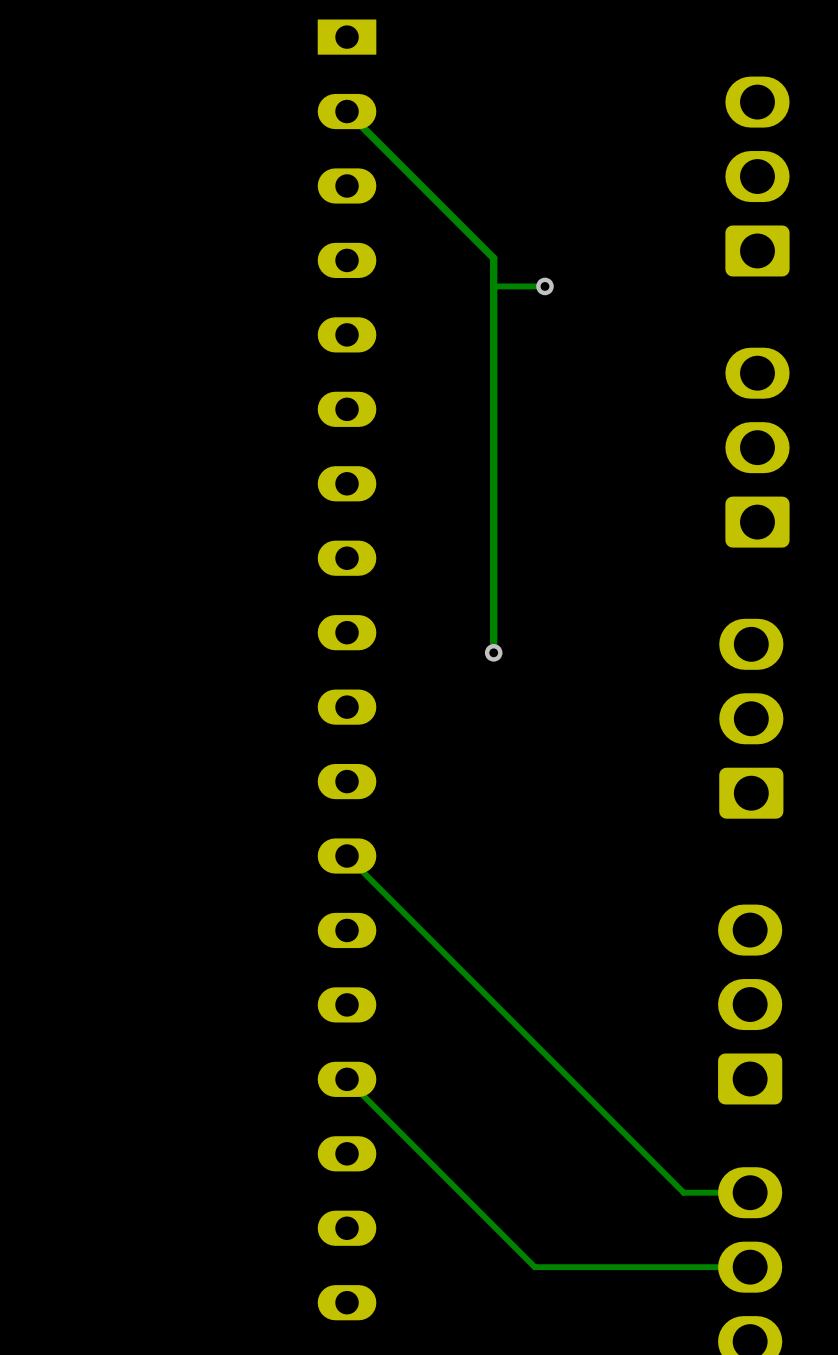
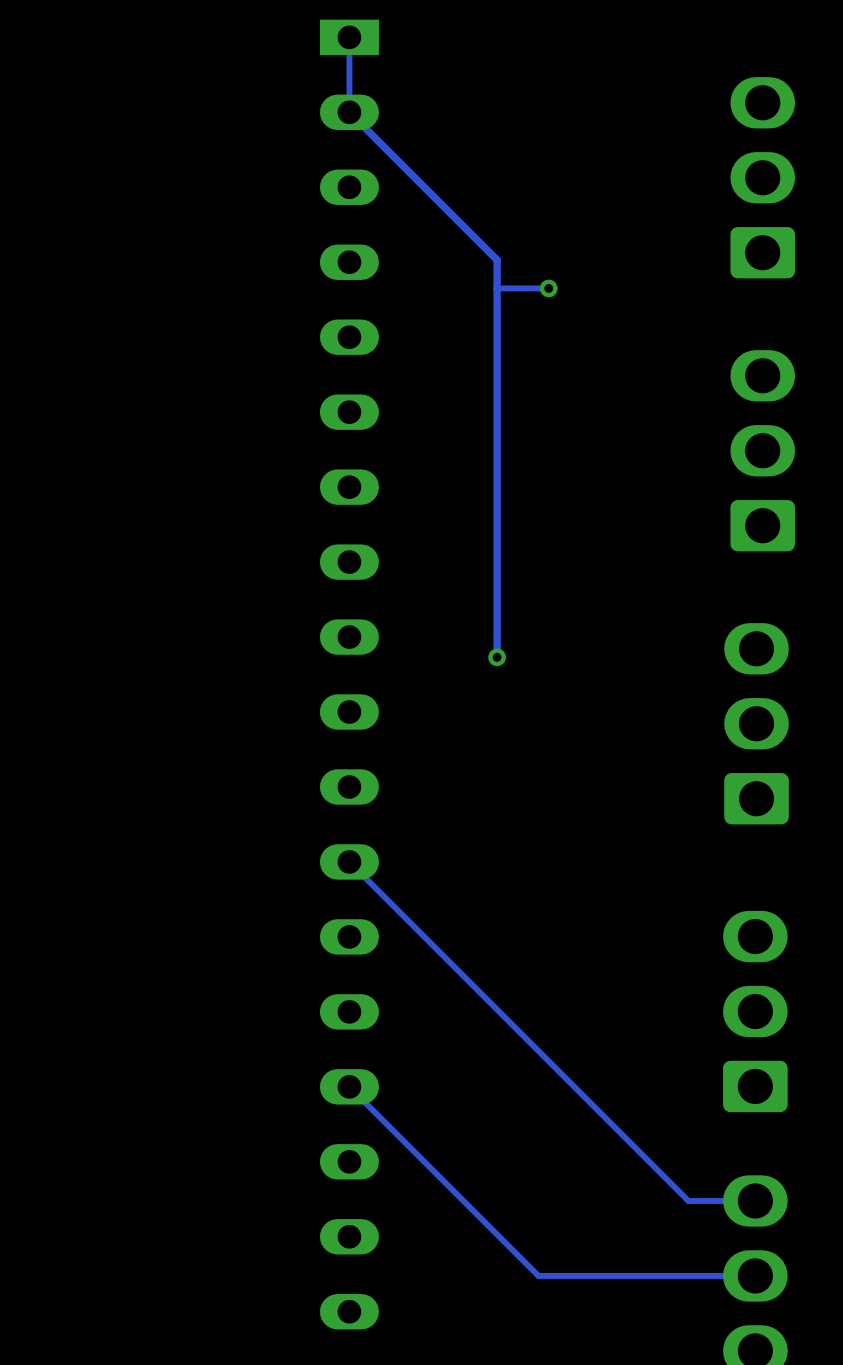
track: none -> (349, 37) (349, 112)

